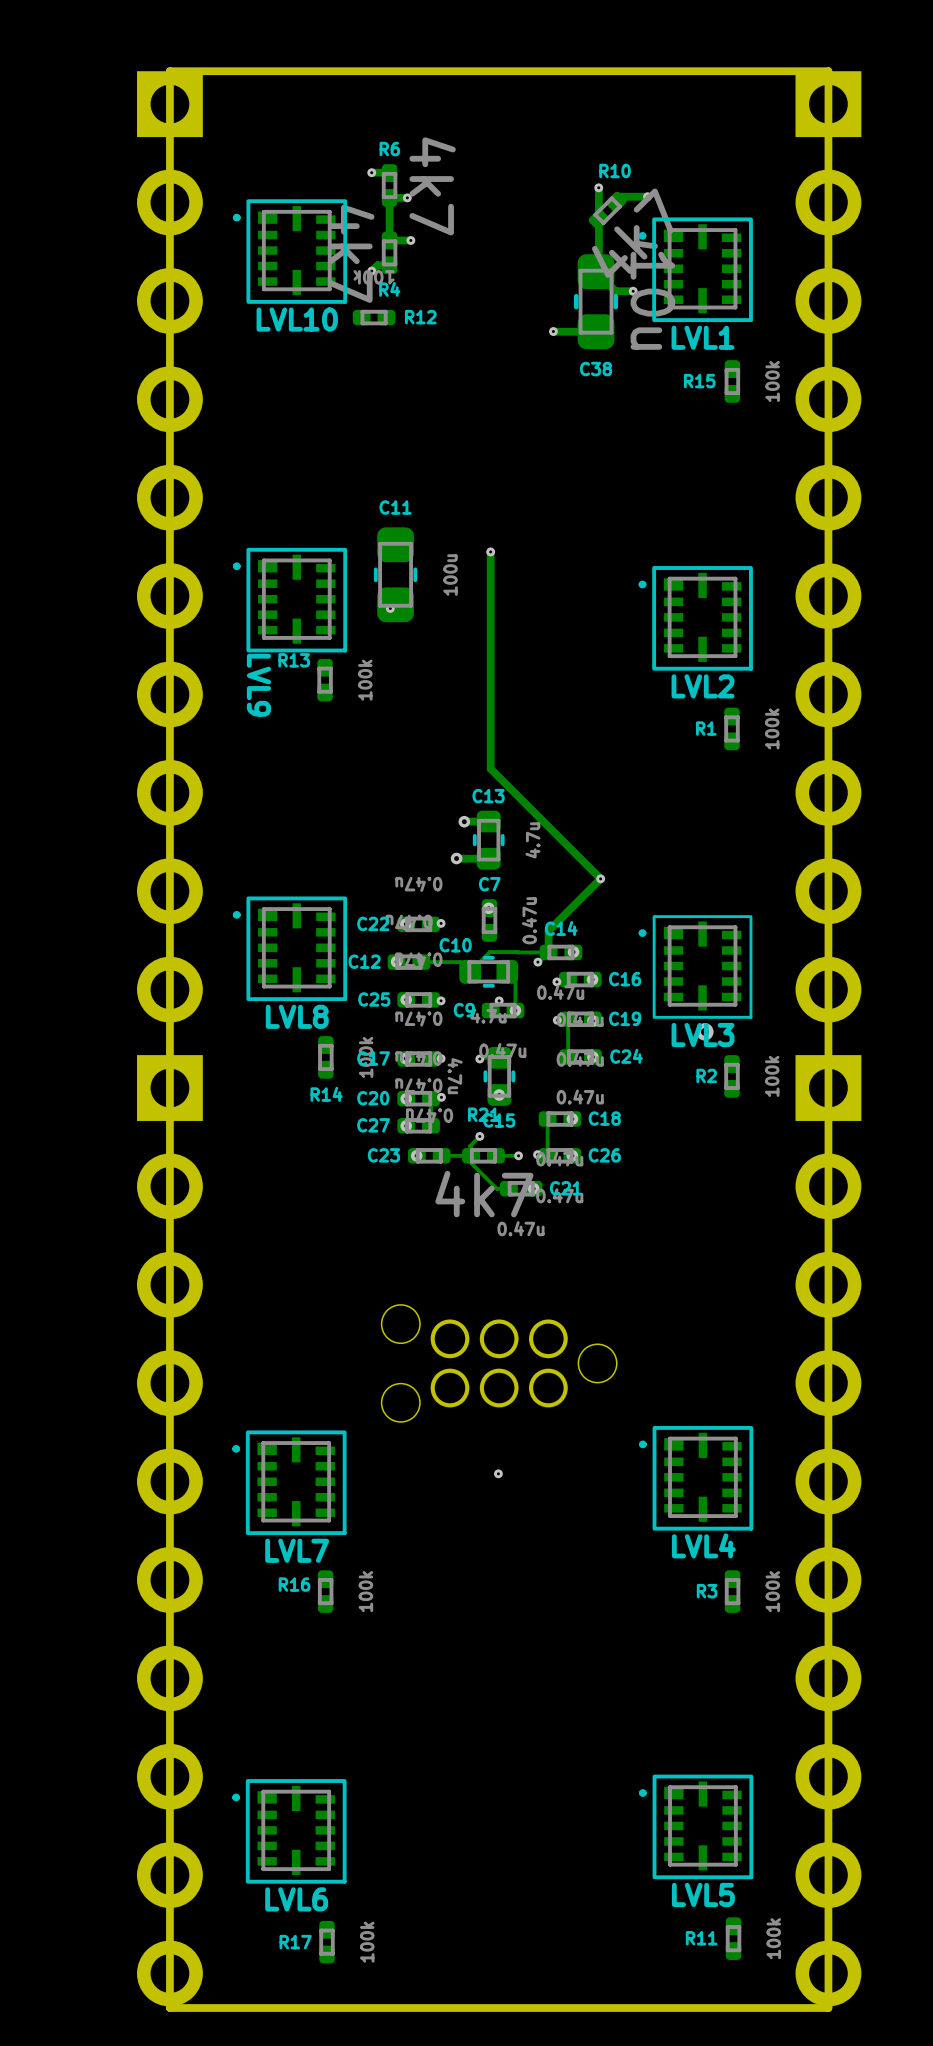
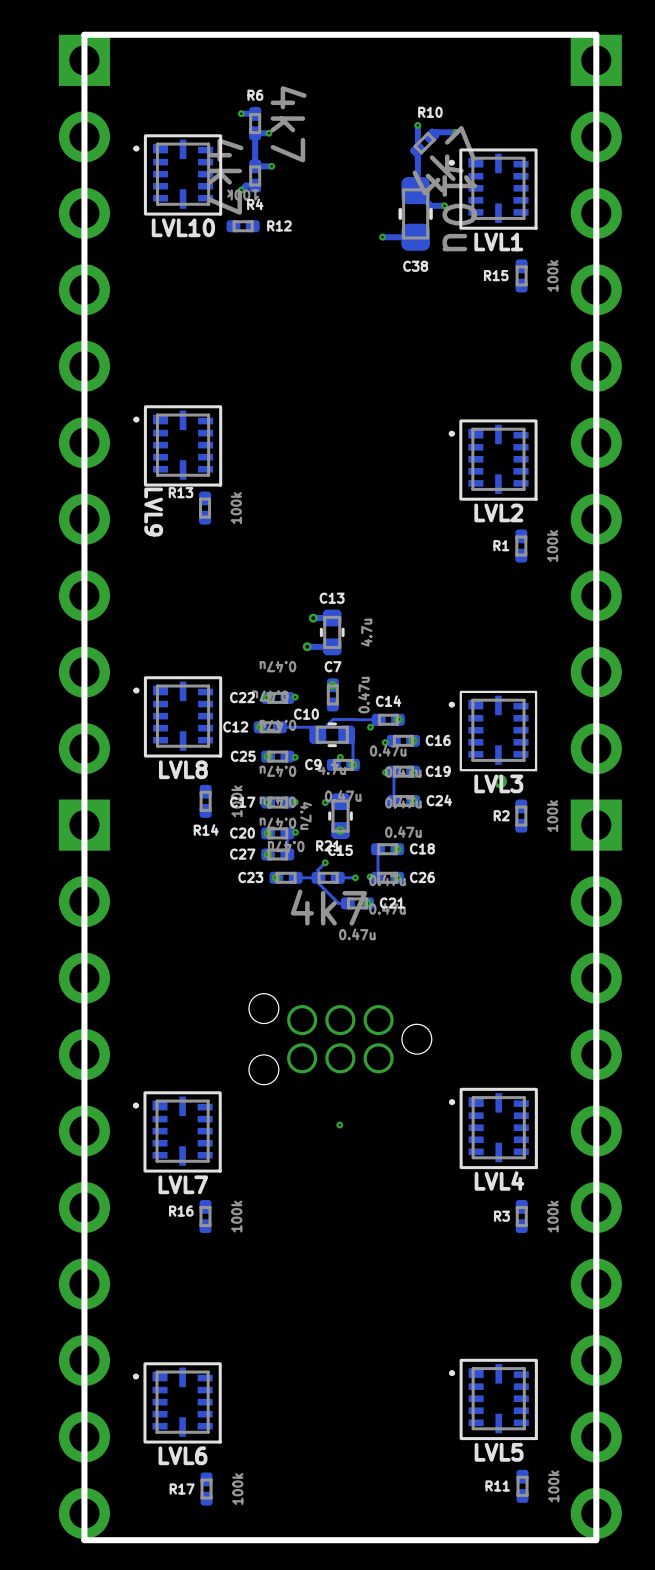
track: (490, 551) (490, 768) (600, 878) (548, 930) (548, 952) -> none
via: (490, 551) -> none
C11: 100u (395, 574) -> none
via: (390, 608) -> none
via: (600, 878) -> none

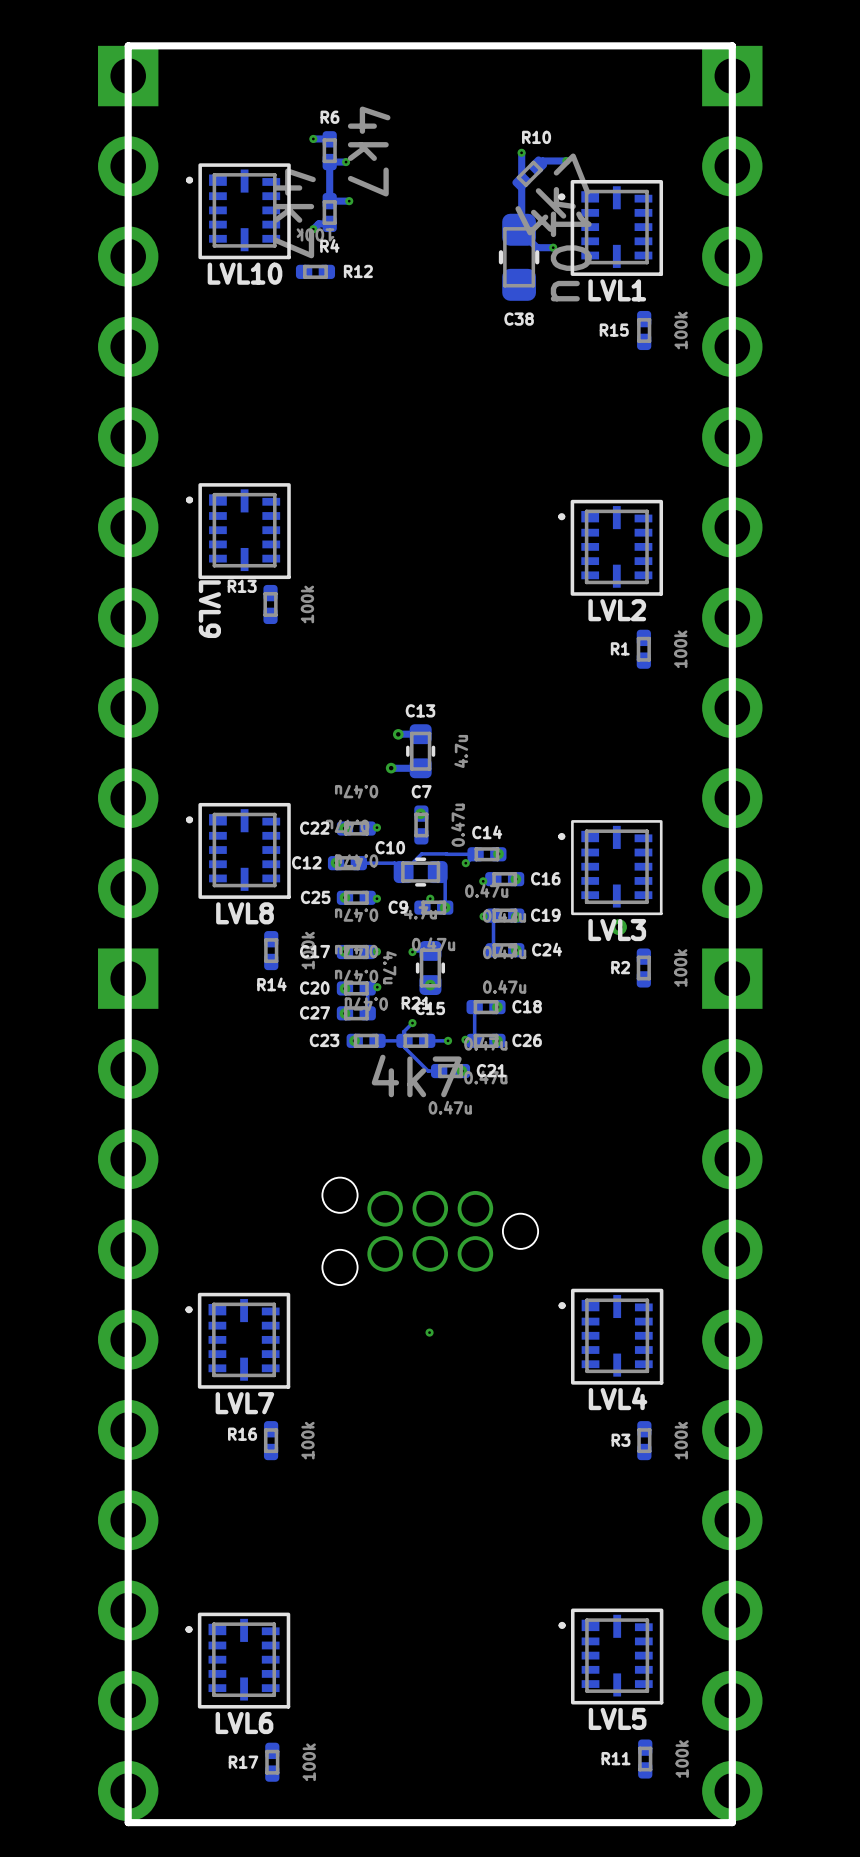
via: (382, 237) -> none
track: (415, 237) (382, 237) -> none

